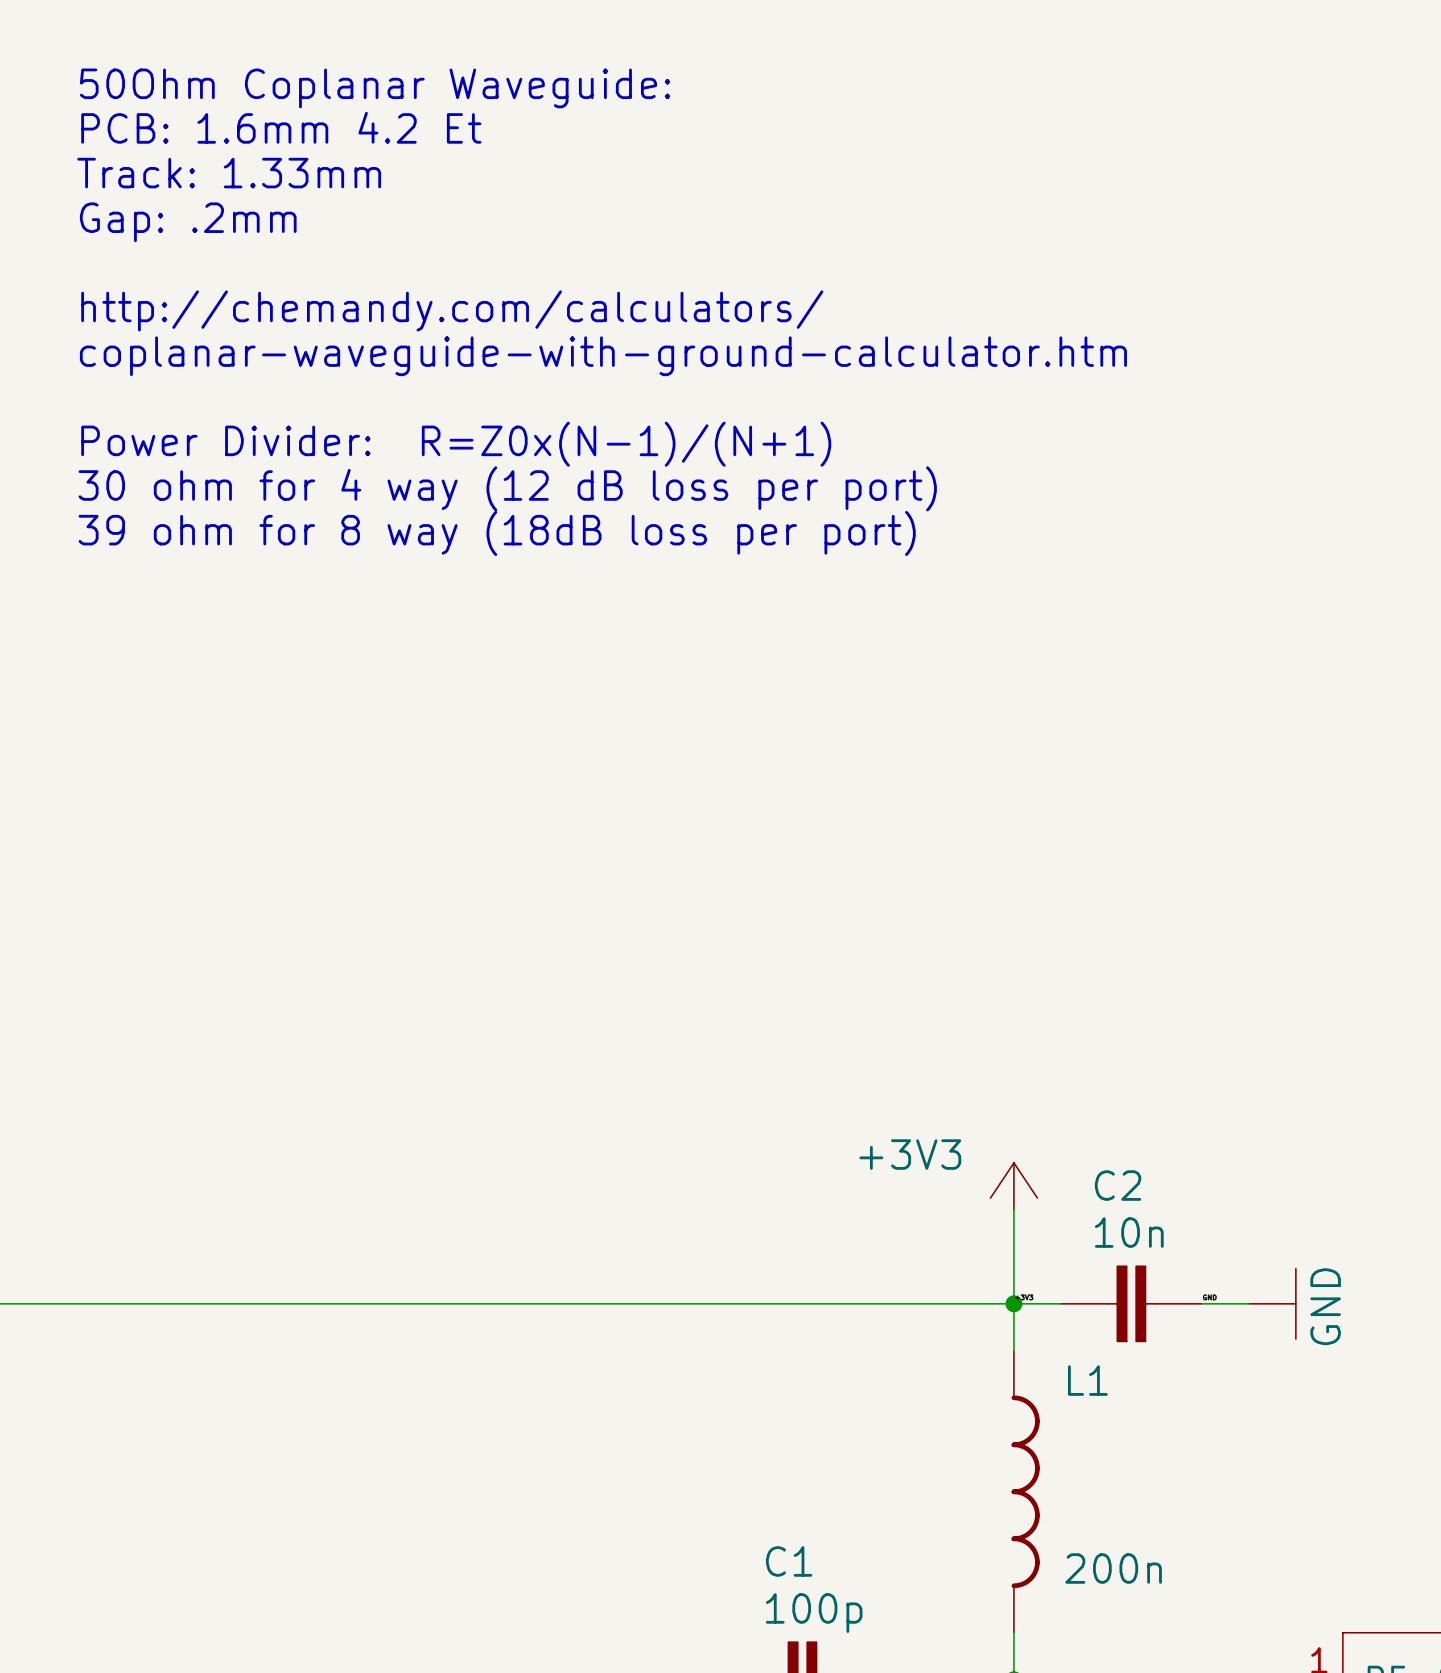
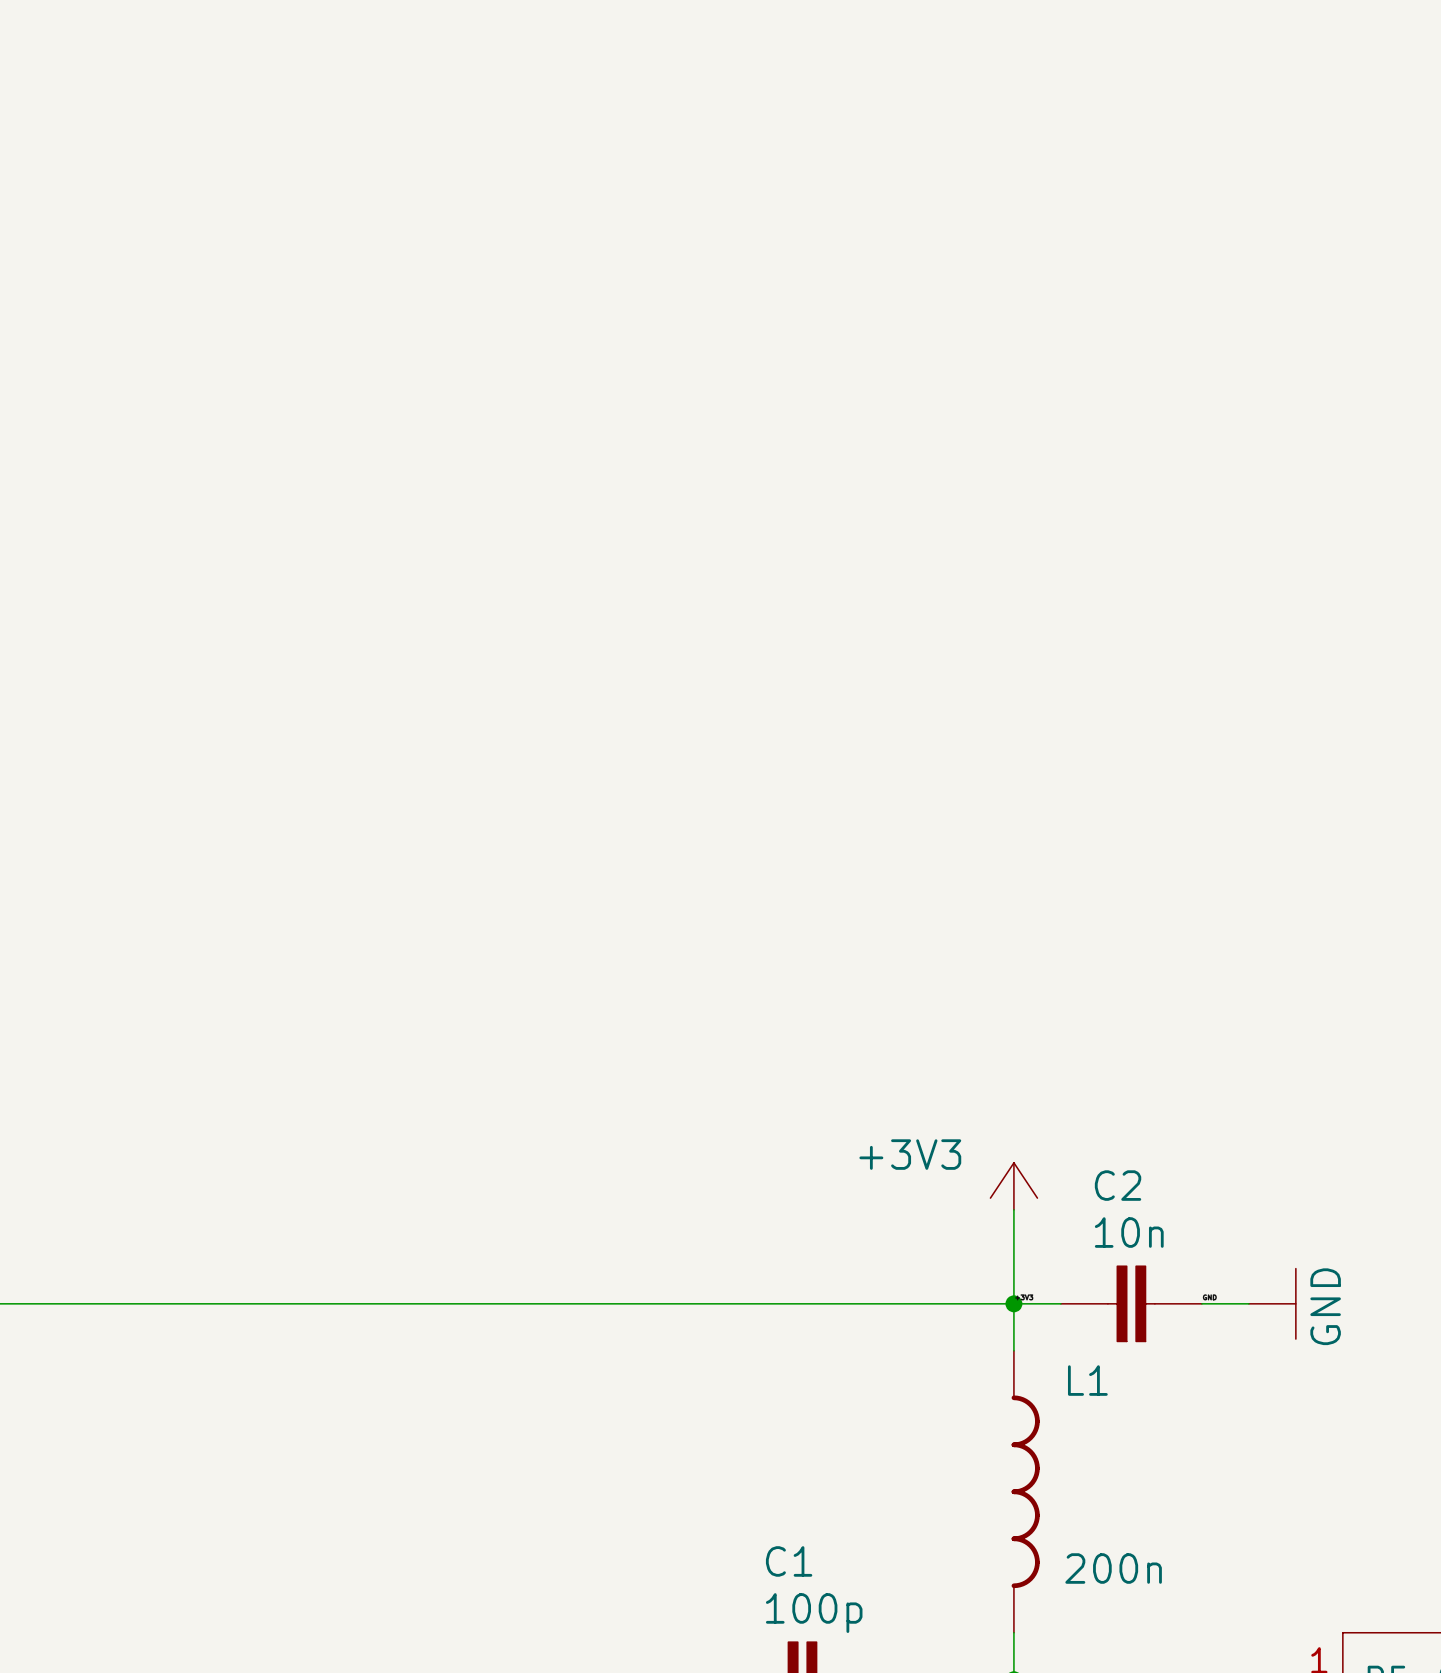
text: 50Ohm Coplanar Waveguide: (375, 88) -> none
text: PCB: 1.6mm 4.2 Et (281, 127) -> none
text: Track: 1.33mm (229, 173) -> none
text: Gap: .2mm (188, 222) -> none
text: http://chemandy.com/calculators/ (452, 310) -> none
text: coplanar-waveguide-with-ground-calculator.htm (603, 356) -> none
text: Power Divider: R=Z0x(N-1)/(N+1) (456, 444) -> none
text: 30 ohm for 4 way (12 dB loss per port) (507, 488) -> none
text: 39 ohm for 8 way (18dB loss per port) (497, 533) -> none

